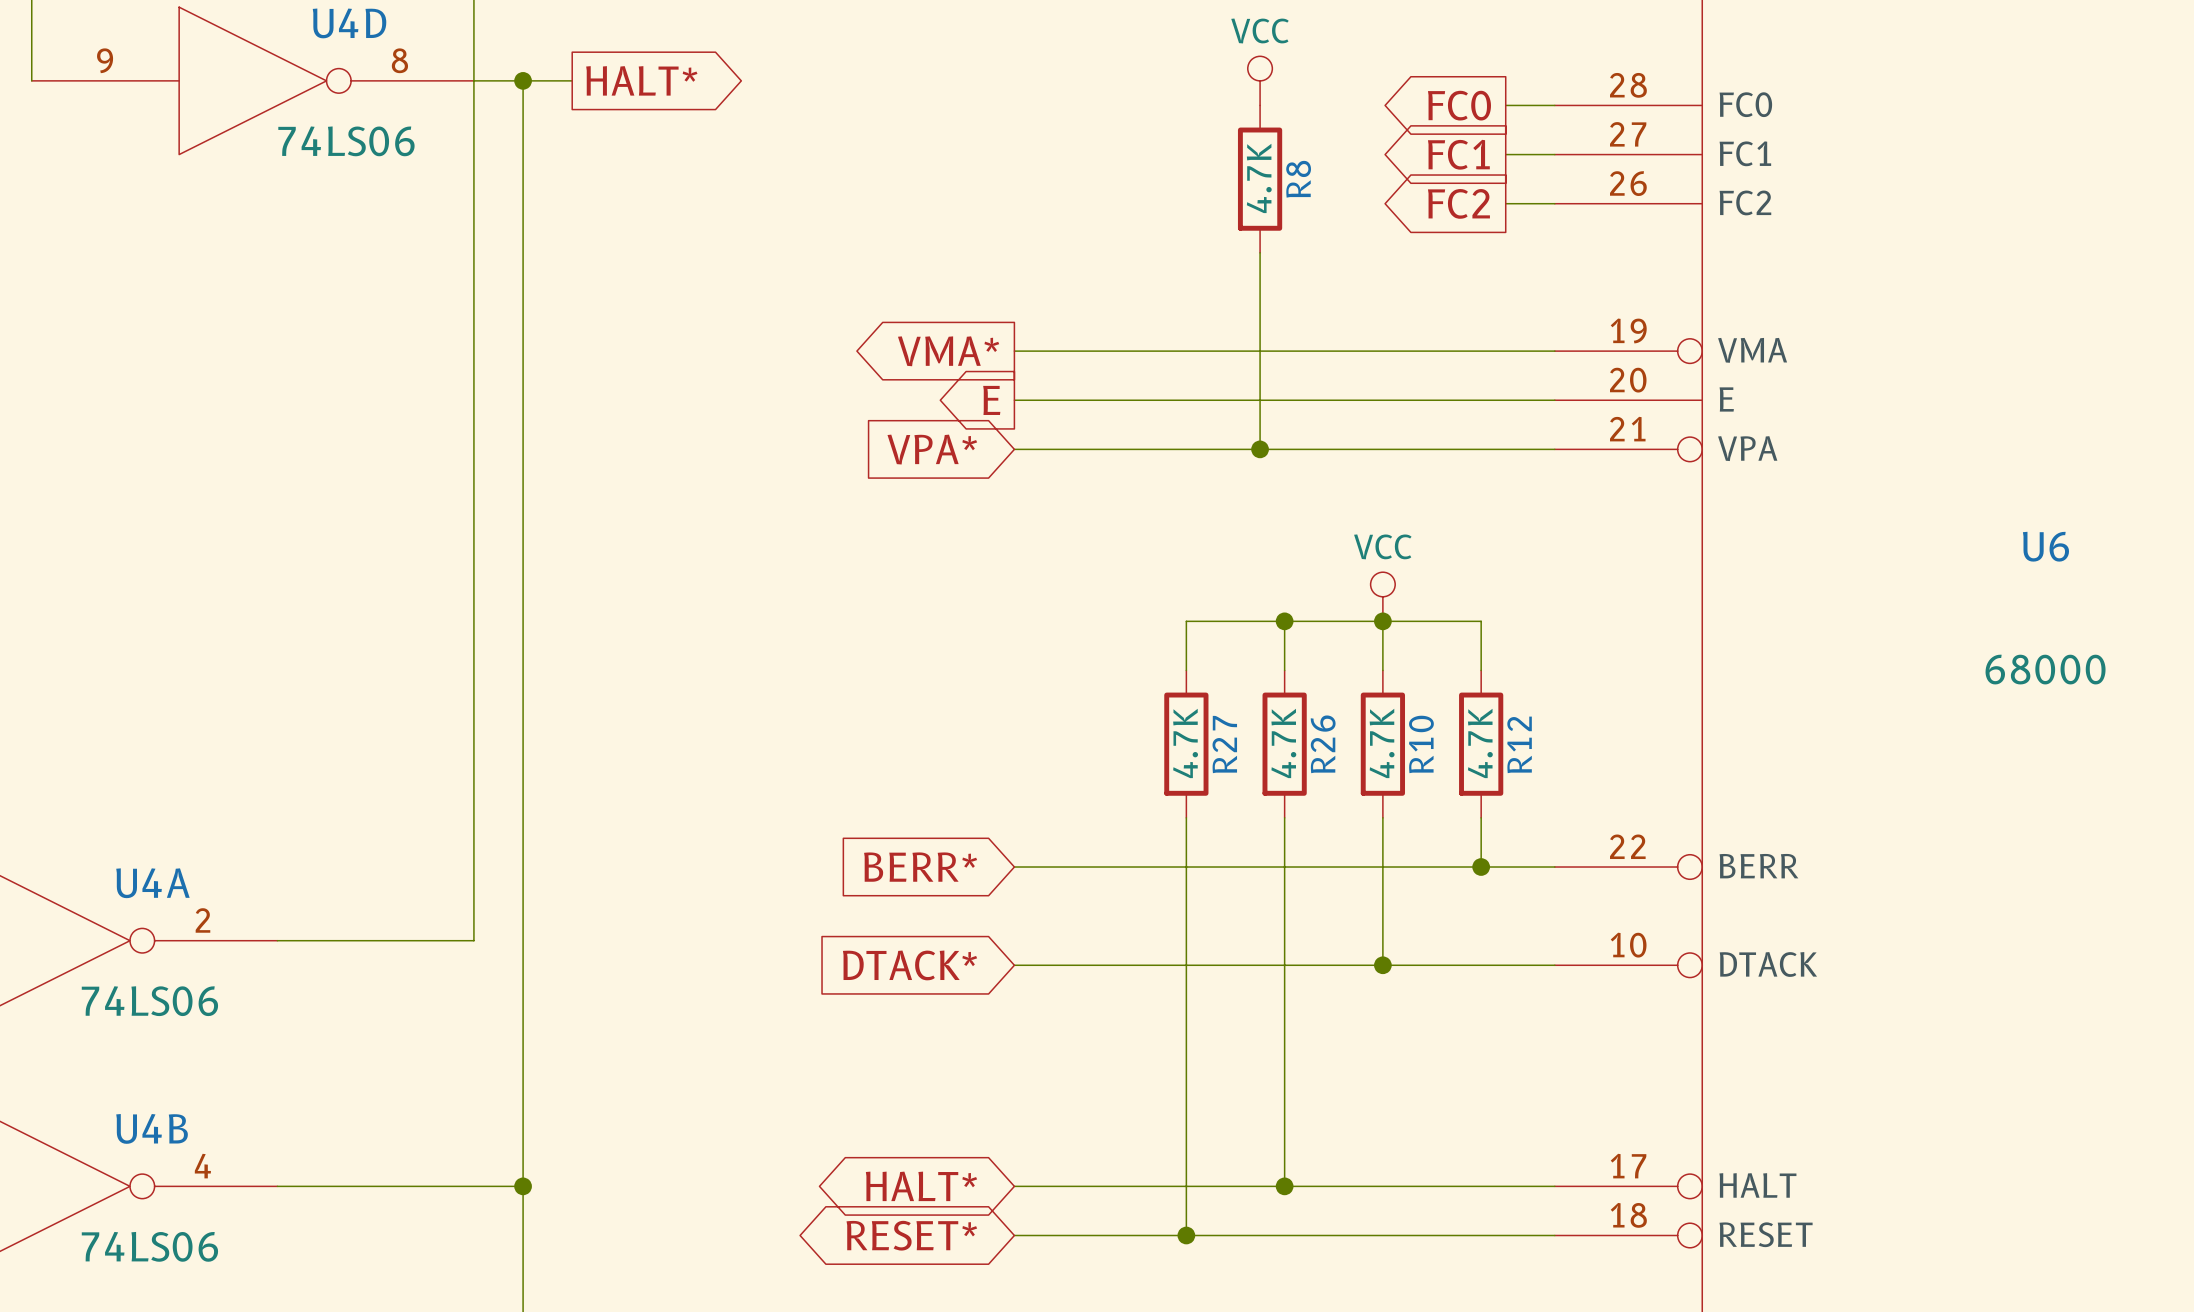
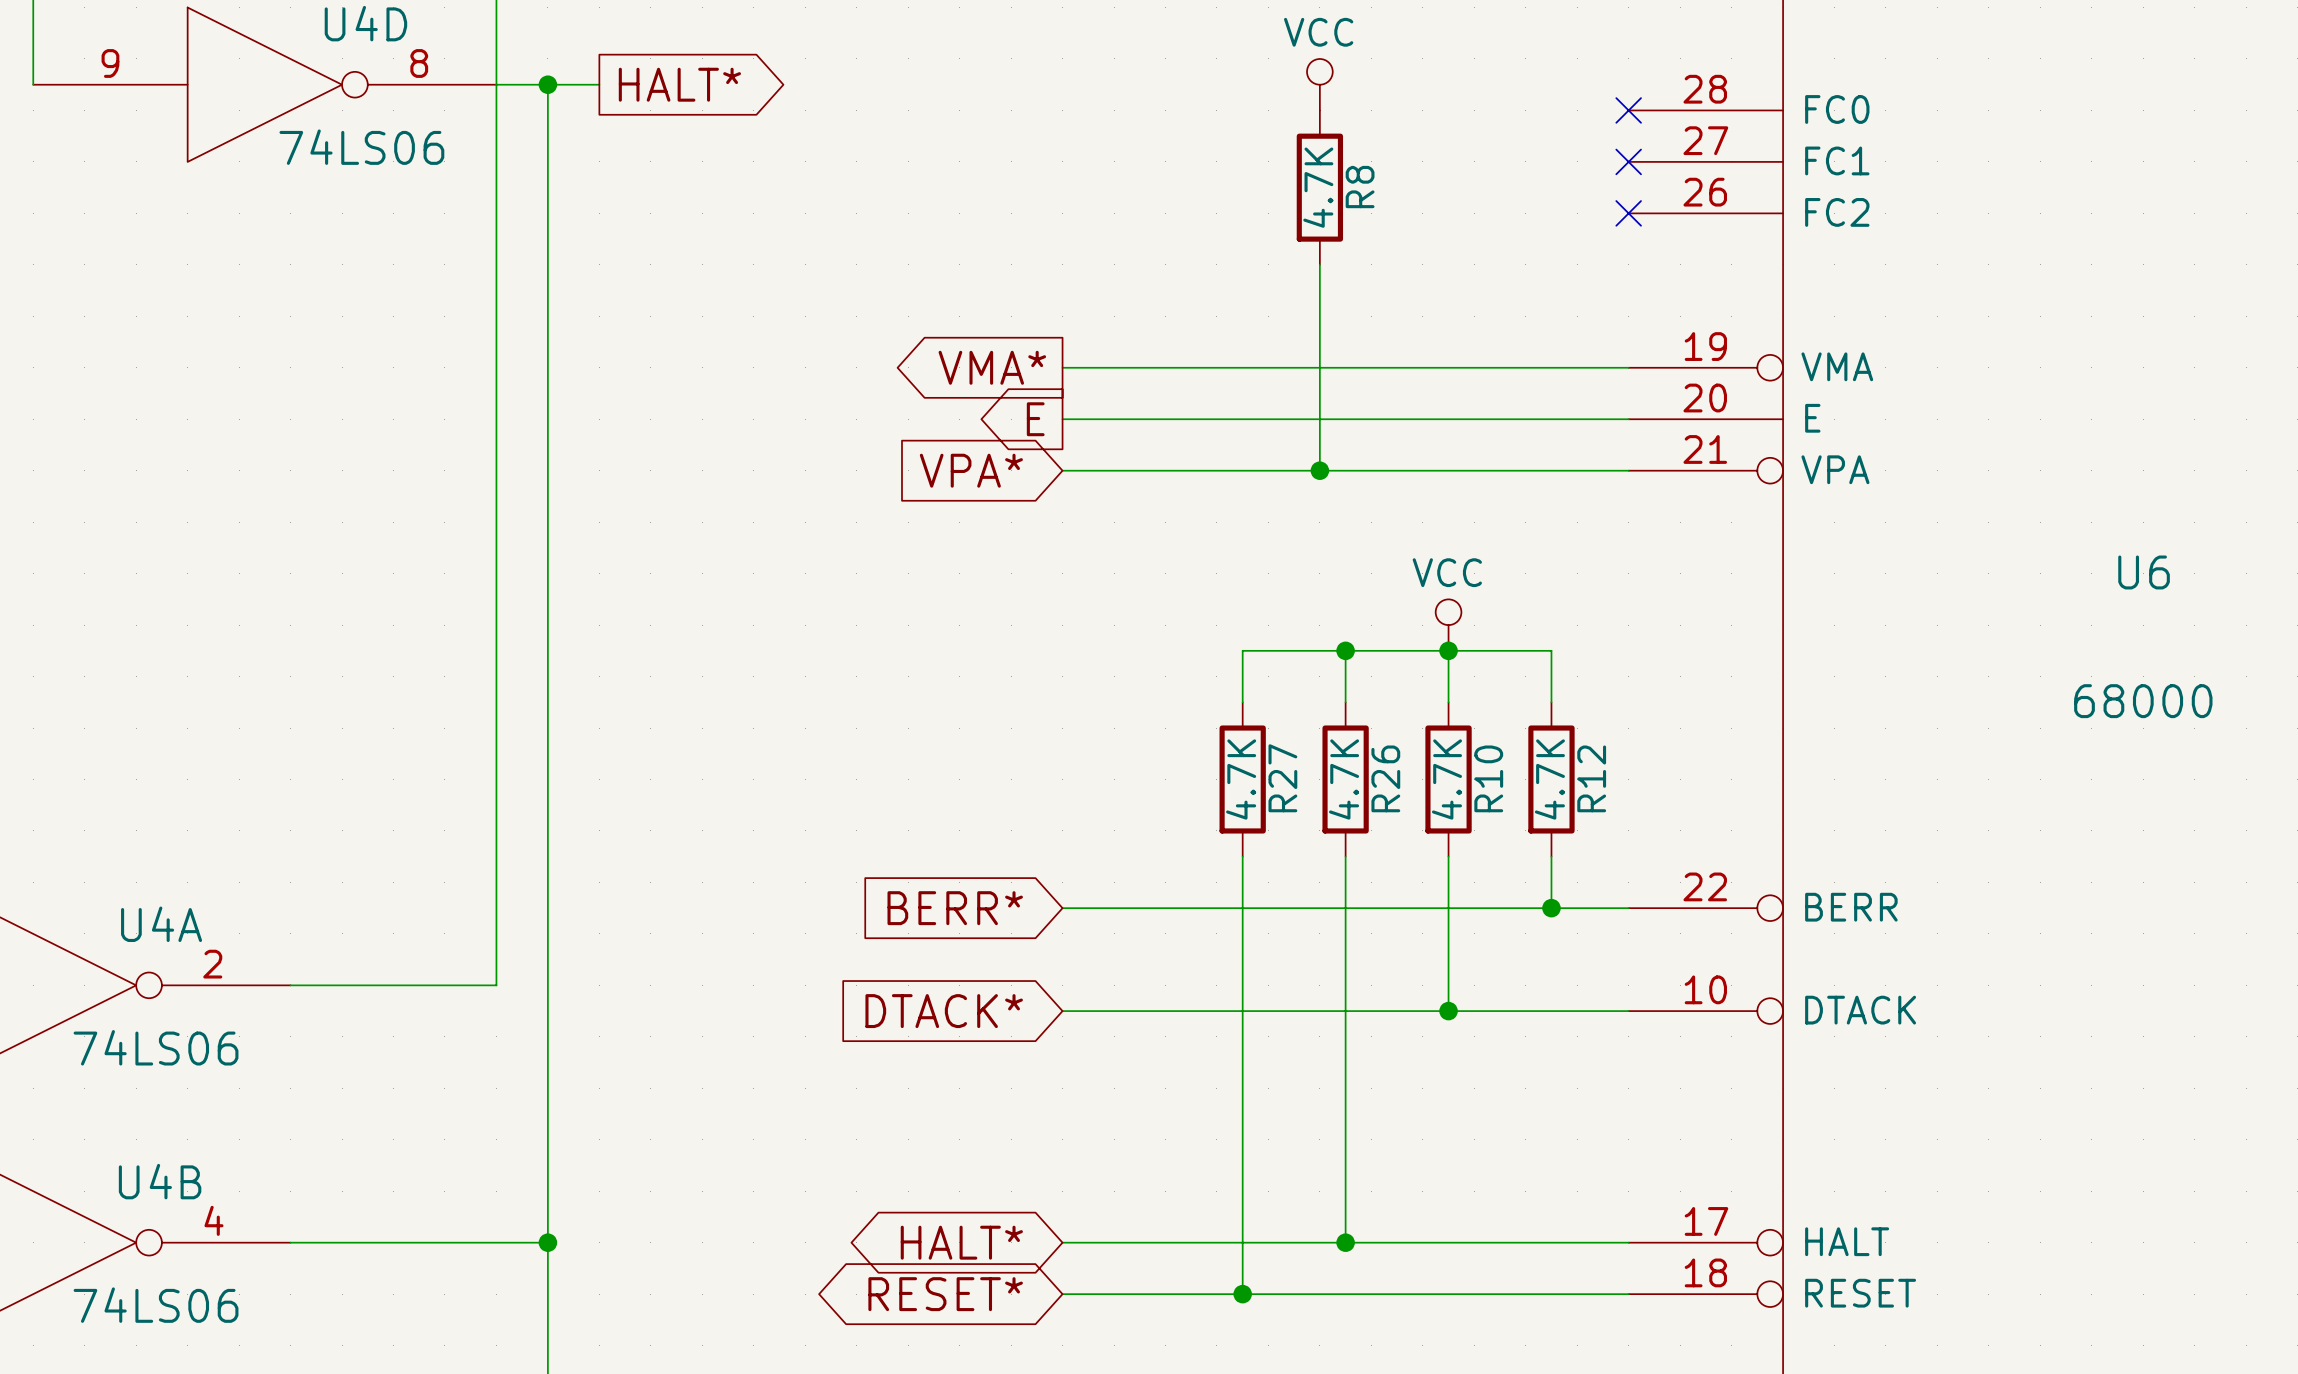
global label: FC0 (1459, 105) -> none
wire: (1505, 105) (1554, 105) -> none
no-connect mark: none -> (1628, 110)
global label: FC1 (1458, 154) -> none
wire: (1505, 154) (1554, 154) -> none
no-connect mark: none -> (1628, 161)
global label: FC2 (1458, 203) -> none
wire: (1505, 203) (1554, 203) -> none
no-connect mark: none -> (1628, 213)

